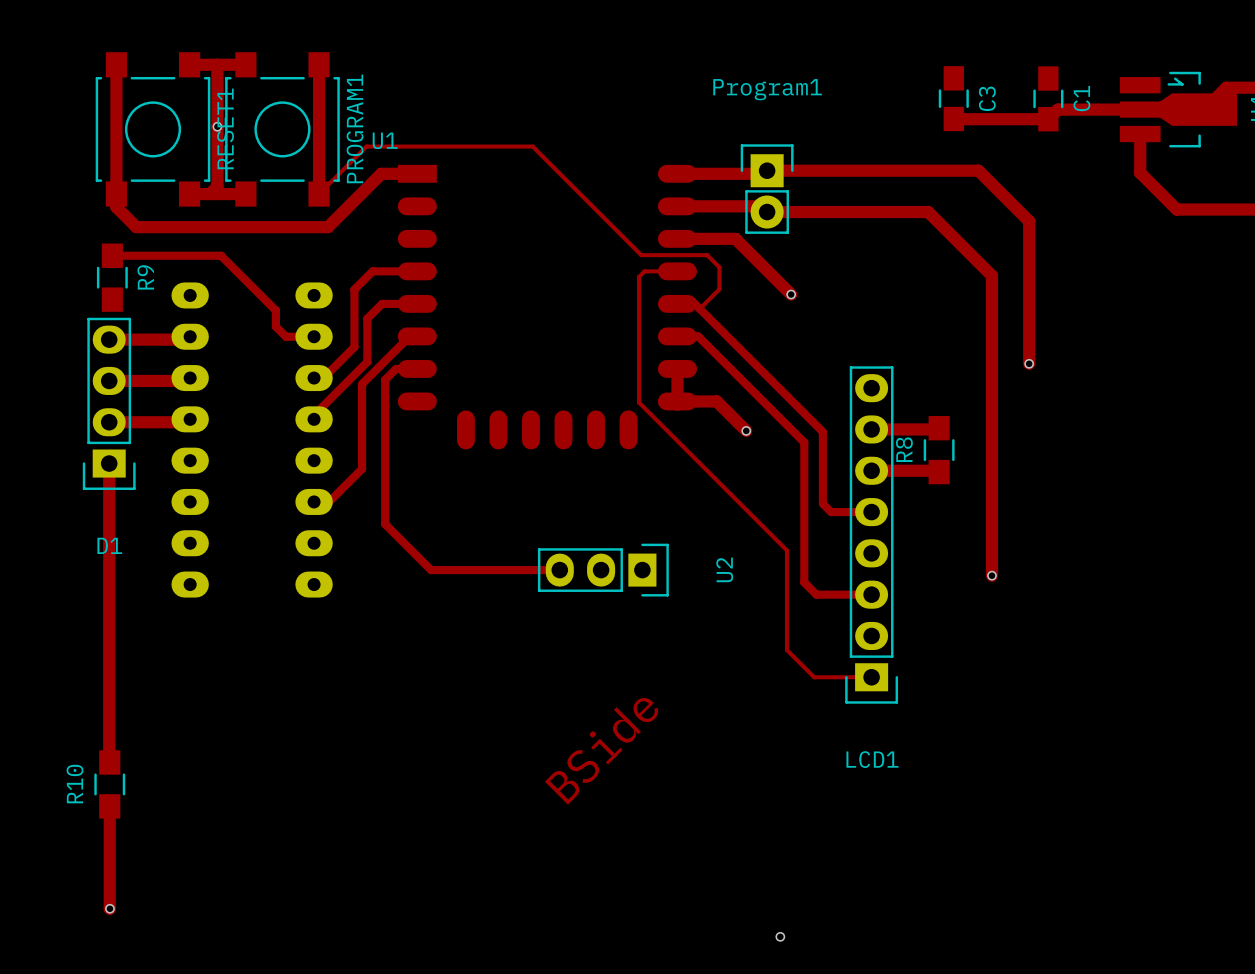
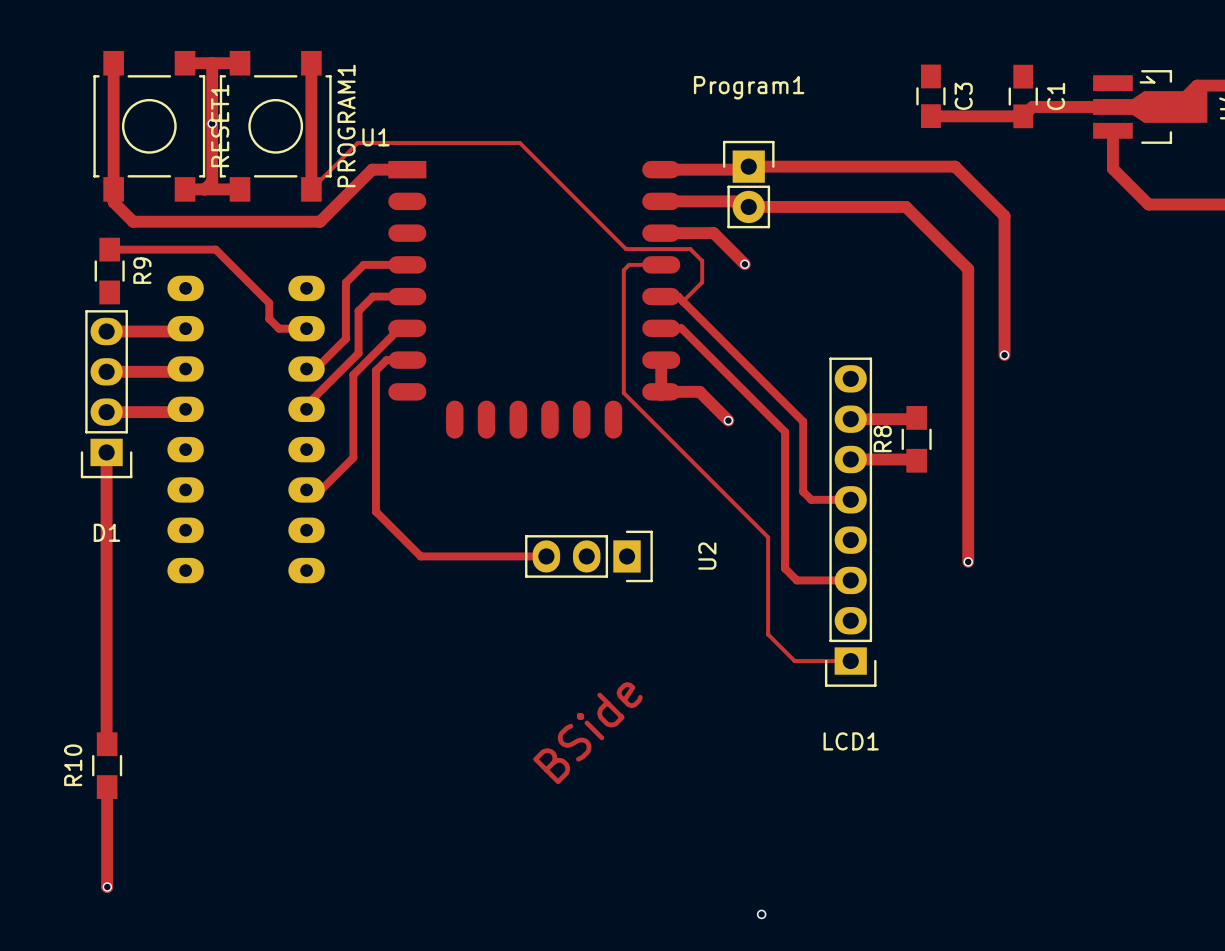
track: (731, 238) (735, 238) (791, 294) -> (713, 233) (744, 264)
via position: (791, 294) -> (744, 264)

